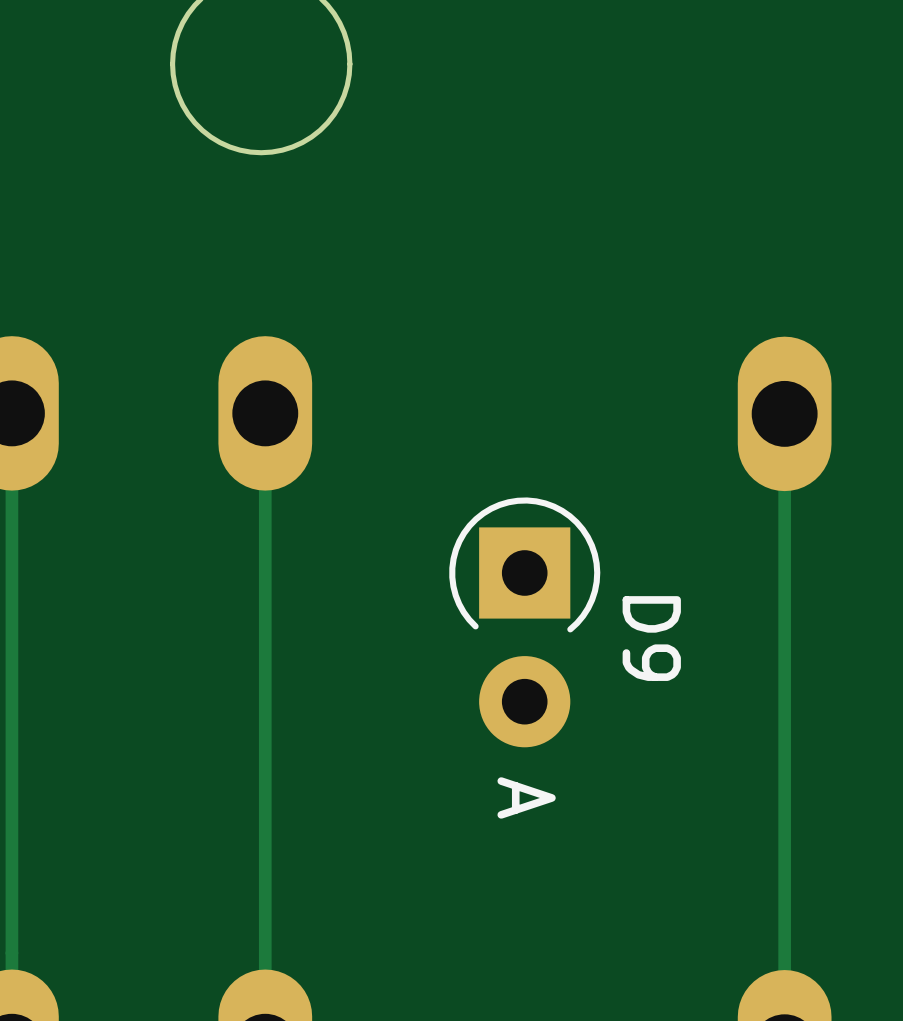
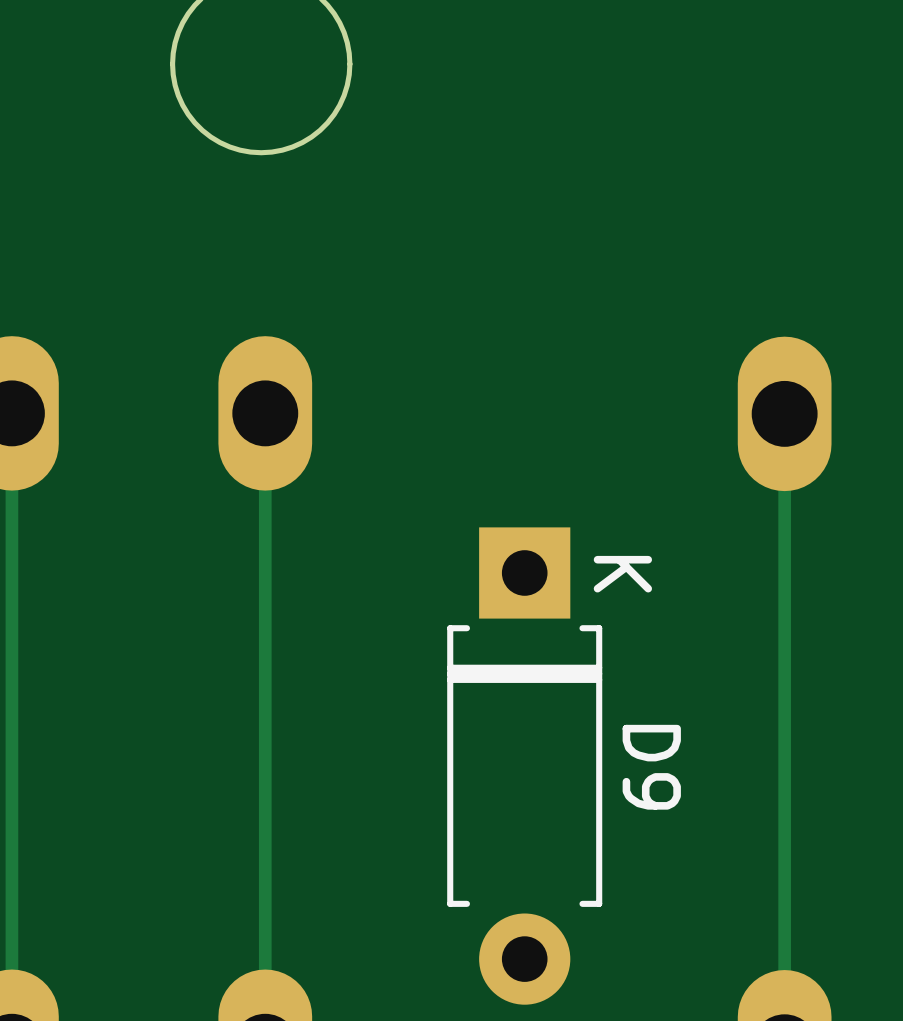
D9 footprint: [449, 497, 601, 748] -> [447, 527, 603, 1005]

